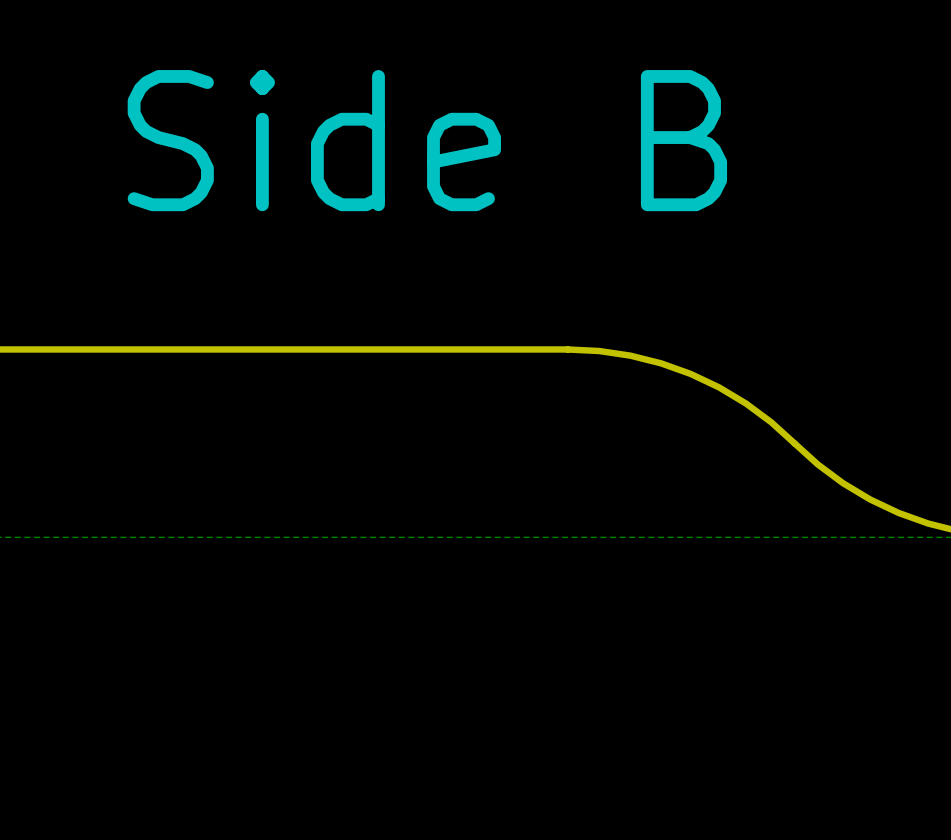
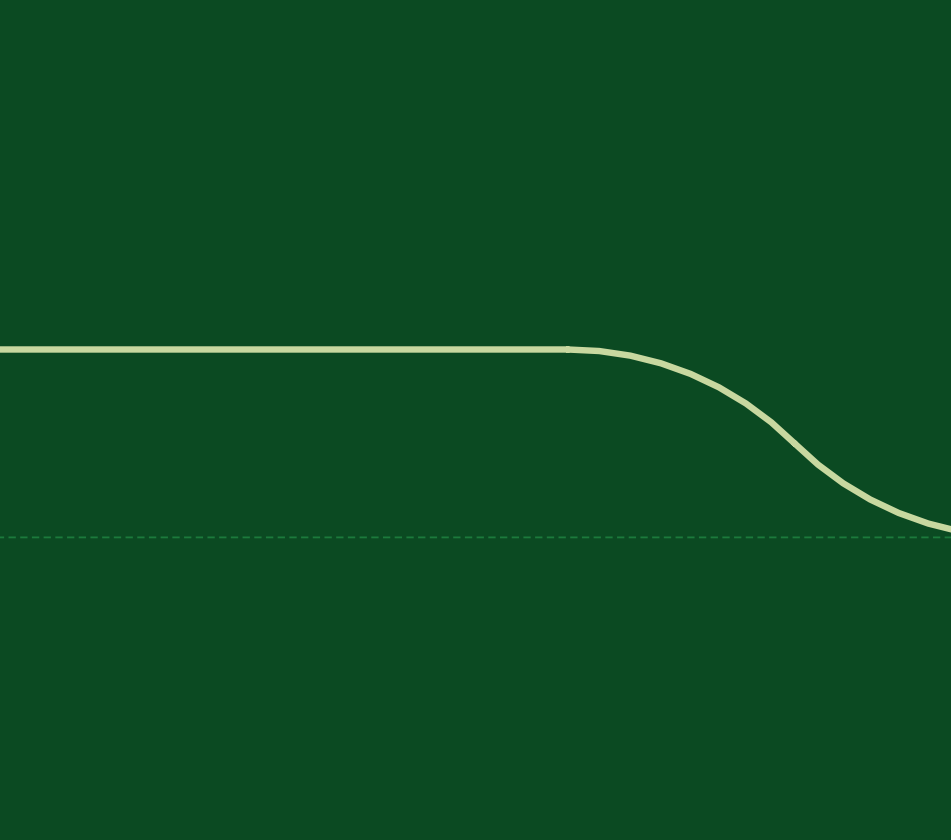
text: Side B (427, 140) -> none

